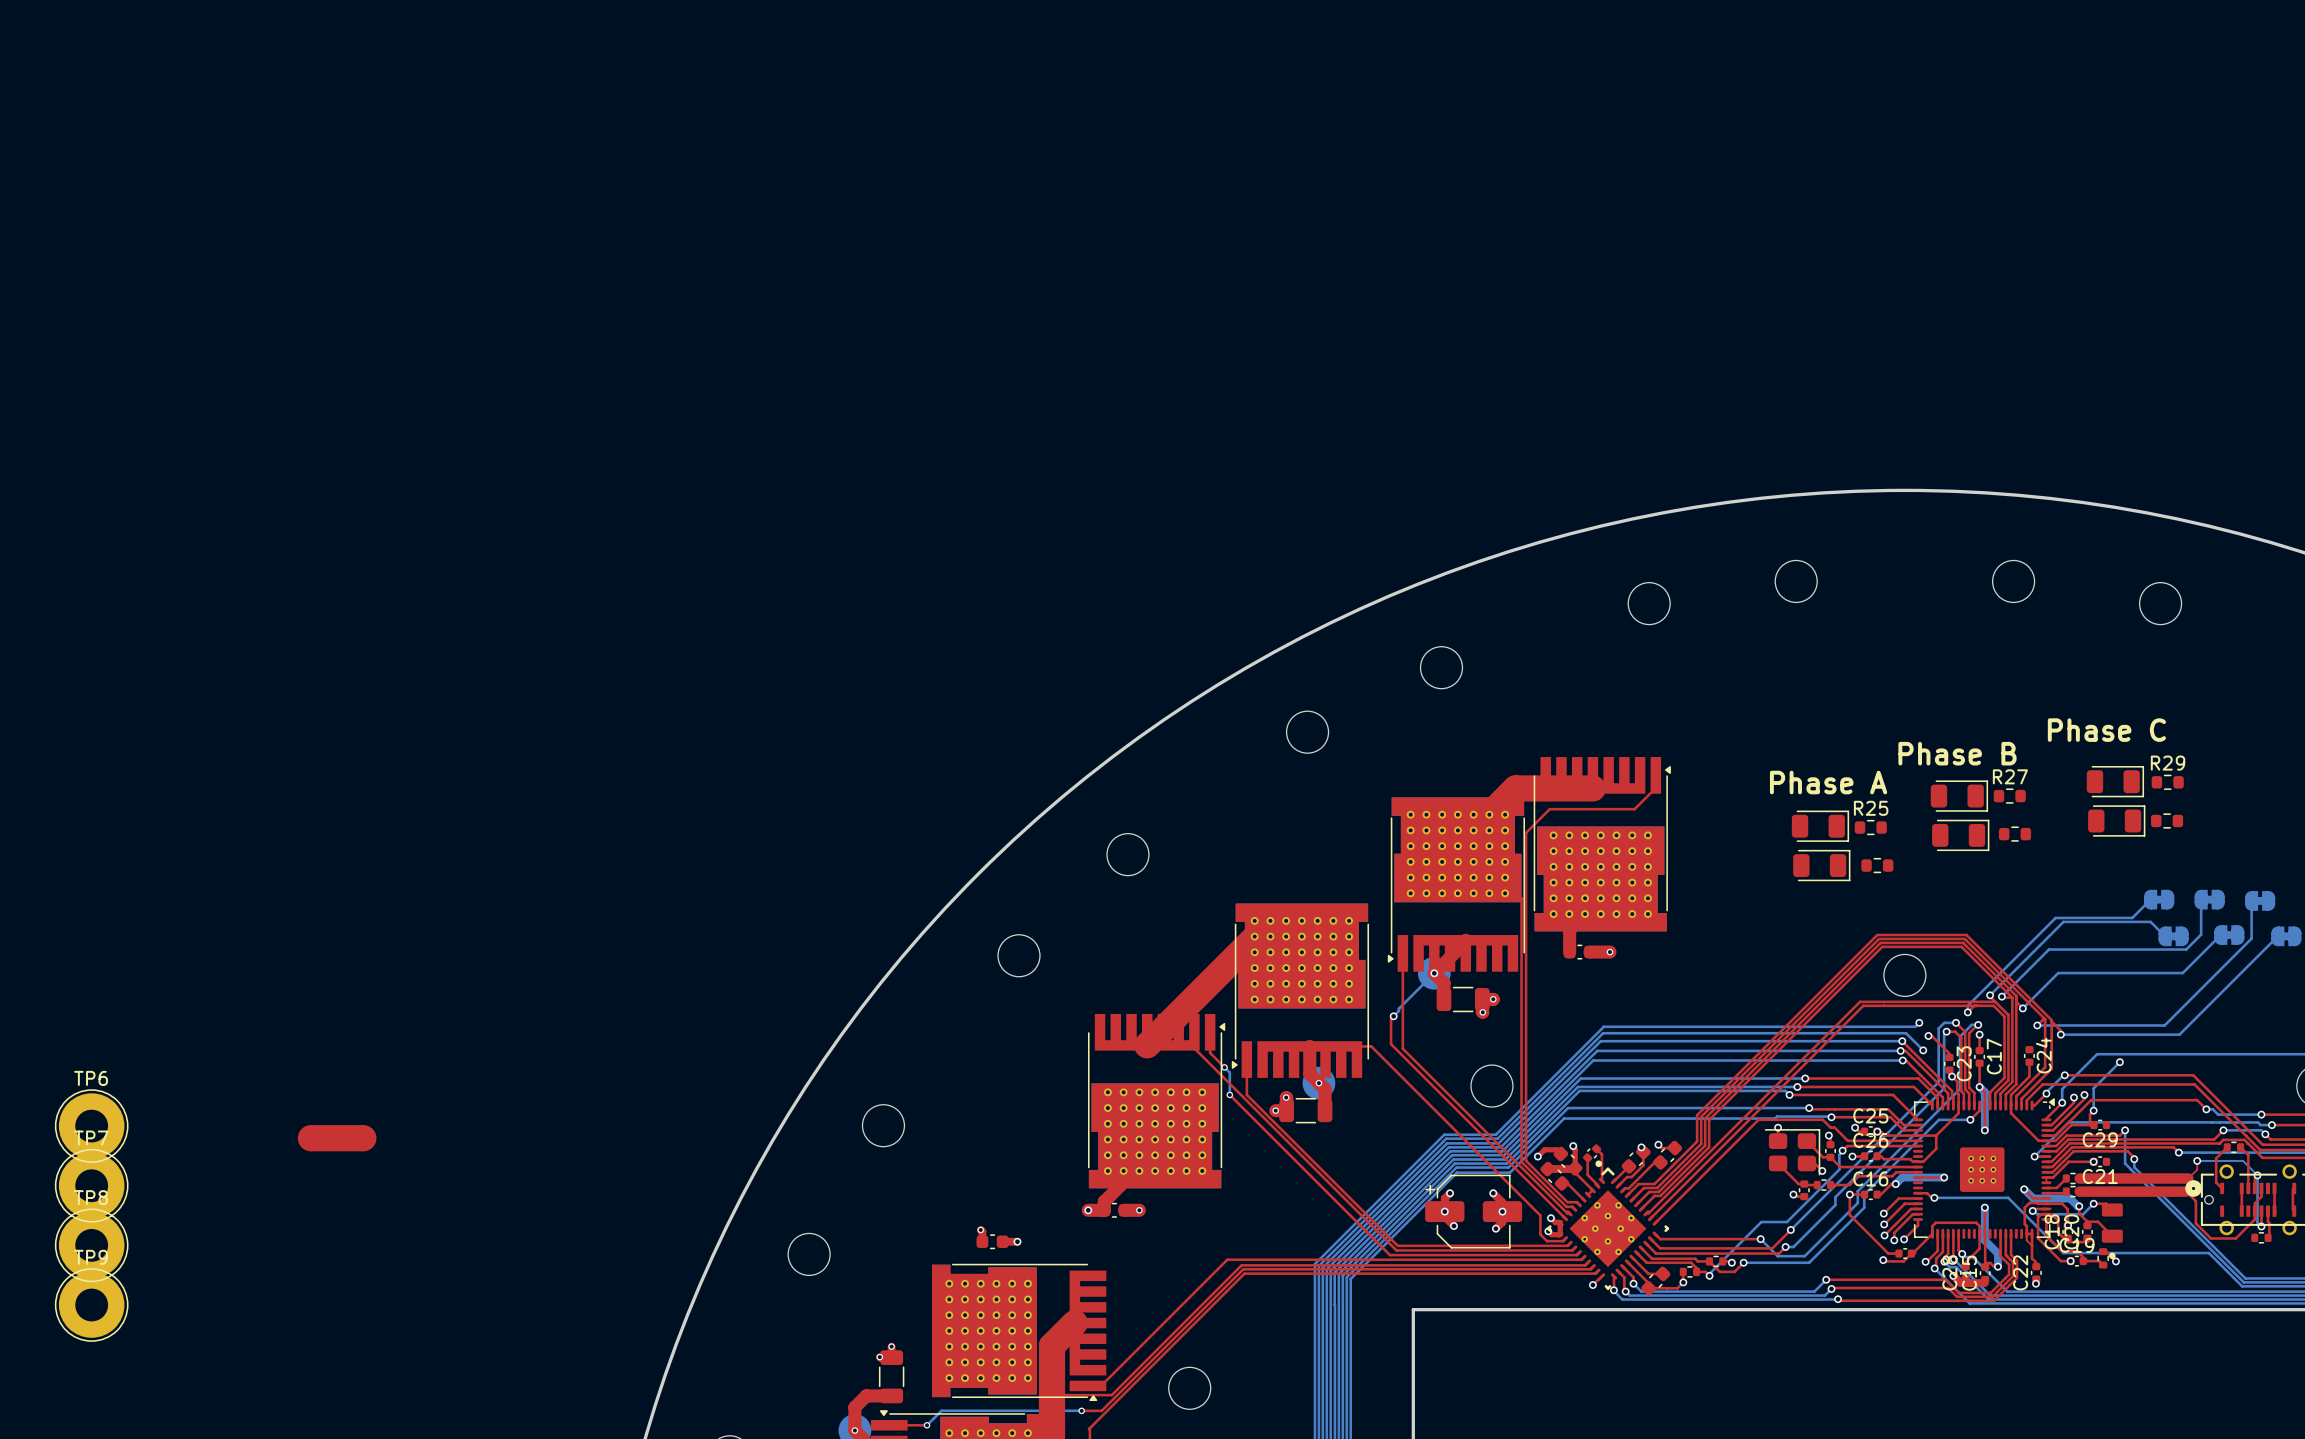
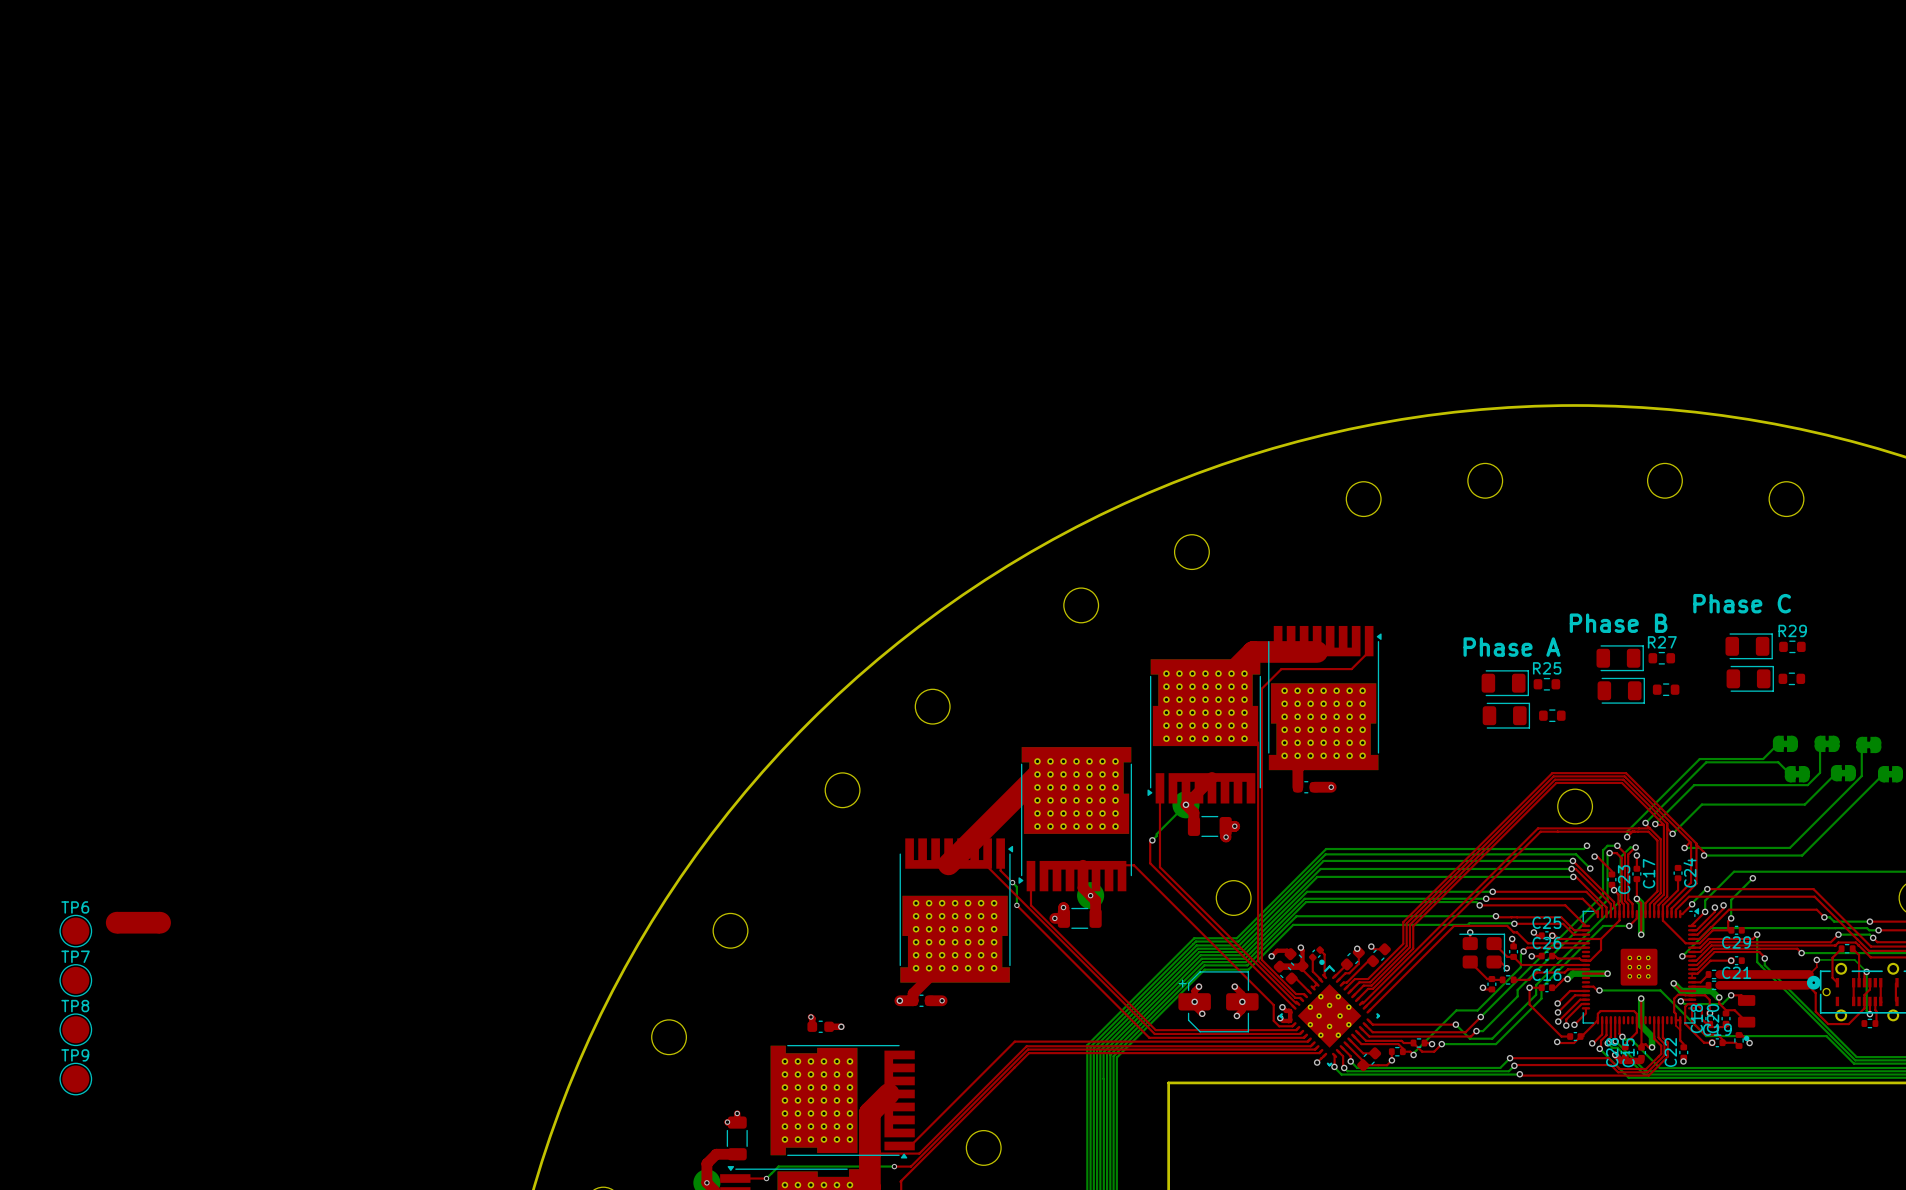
TP6 footprint: [54, 1089, 129, 1163] -> [59, 914, 93, 948]
part position: (337, 1138) -> (138, 922)
TP7 footprint: [54, 1148, 129, 1223] -> [59, 964, 93, 997]
TP8 footprint: [54, 1208, 129, 1283] -> [59, 1013, 93, 1047]
TP9 footprint: [54, 1268, 129, 1342] -> [59, 1062, 93, 1096]

